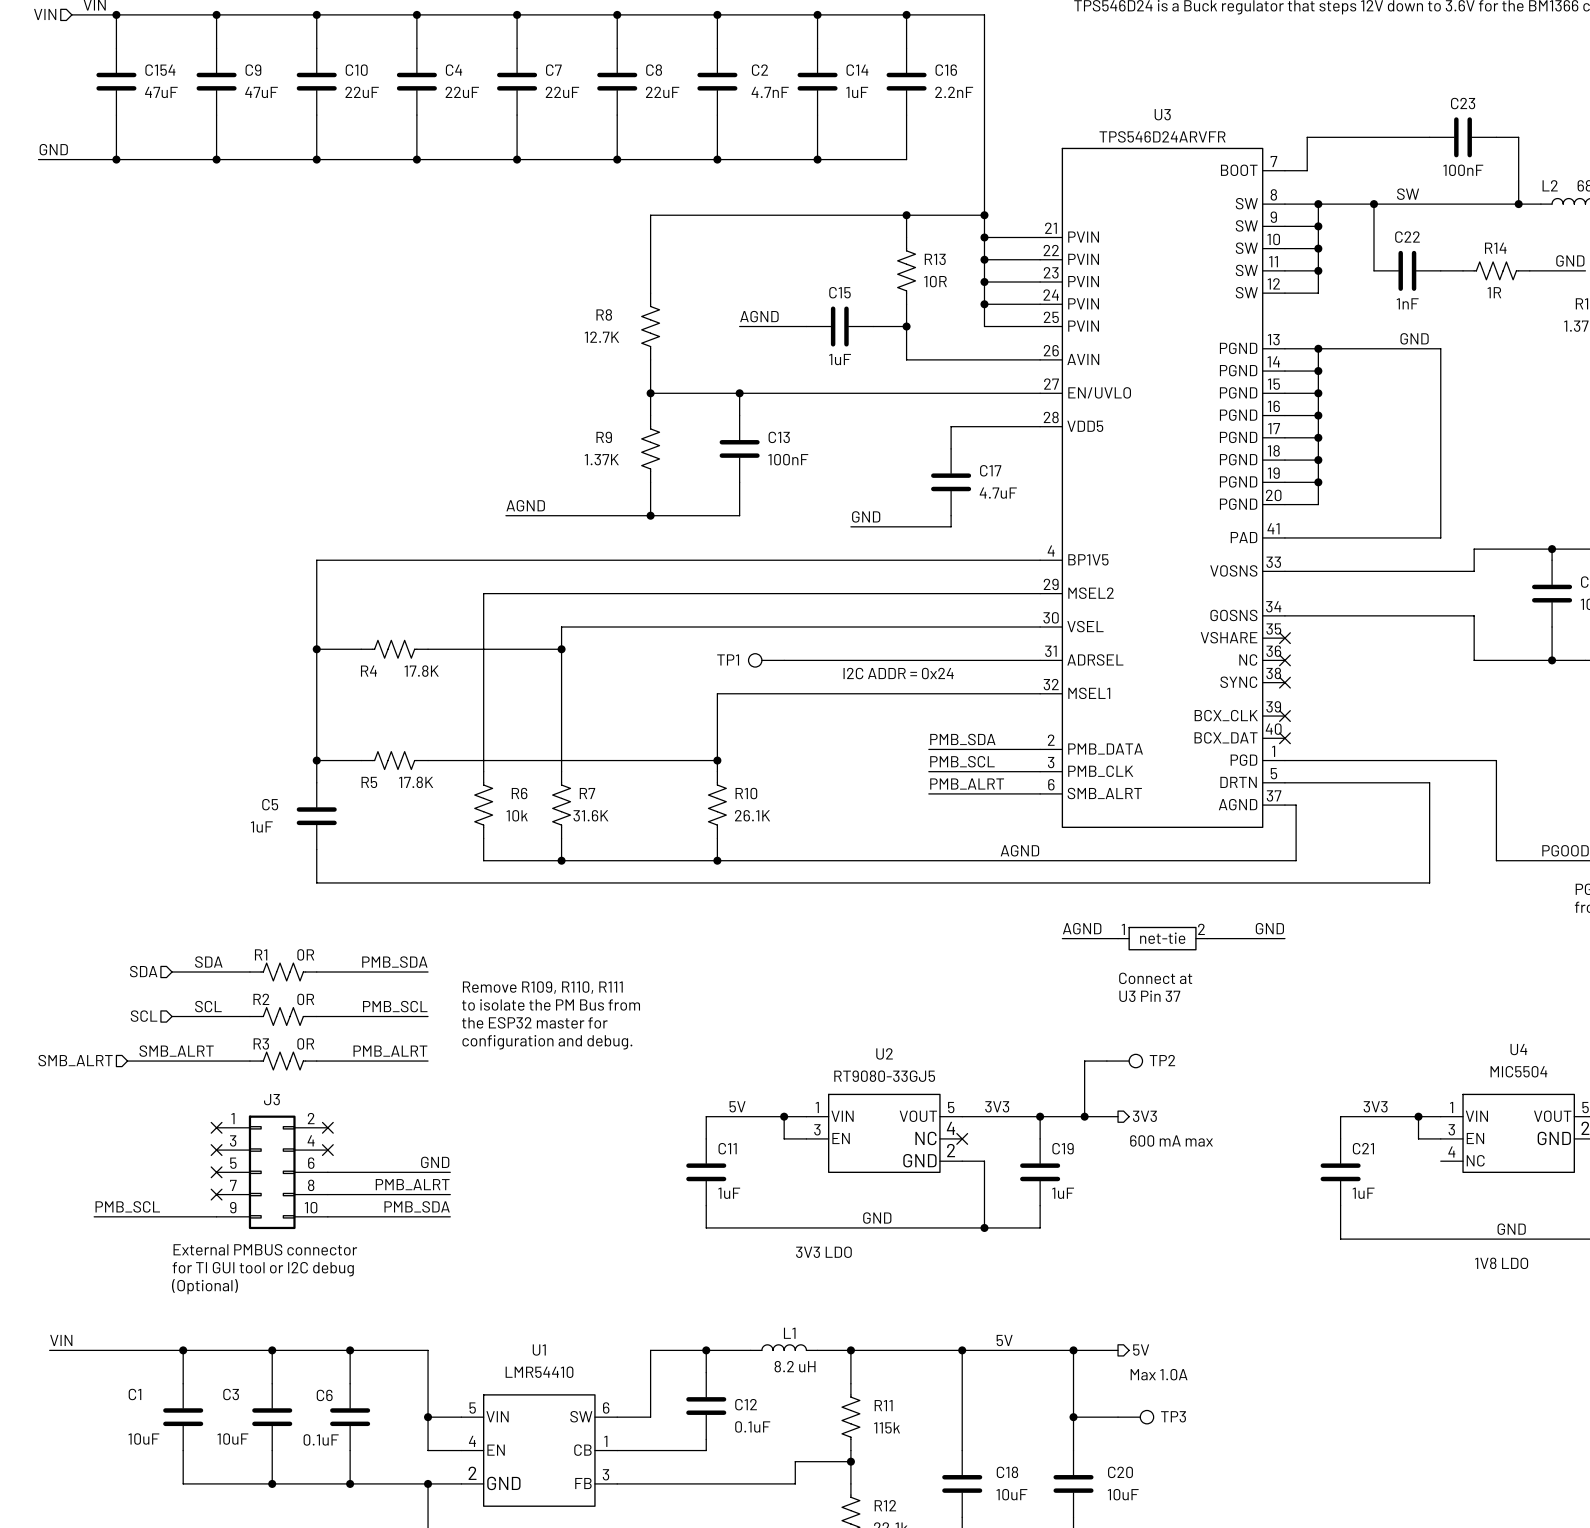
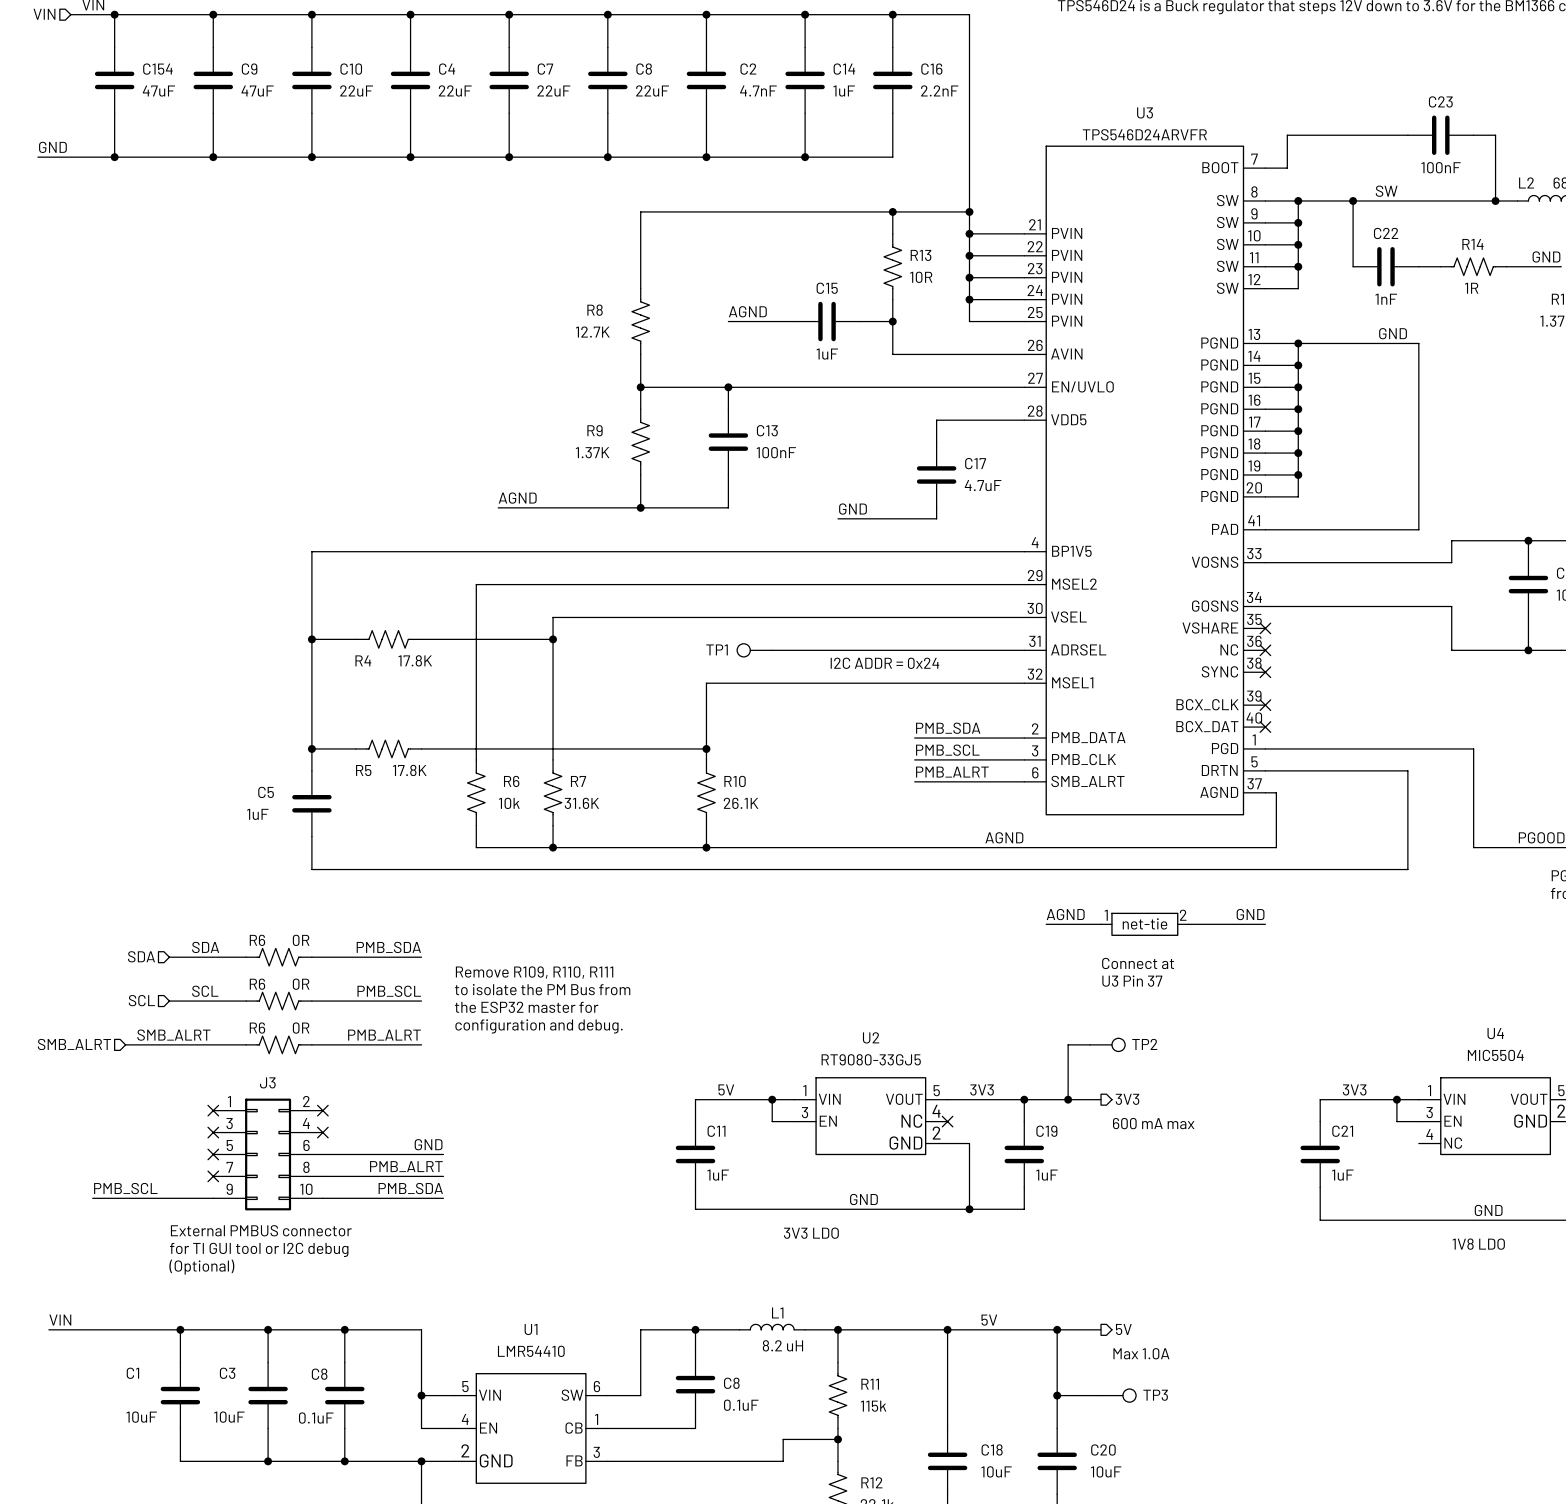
R1 name: R1 (261, 954) -> R6 (257, 940)
R2 name: R2 (261, 999) -> R6 (257, 984)
R3 name: R3 (261, 1043) -> R6 (257, 1028)
C6 name: C6 (324, 1395) -> C8 (319, 1374)
C12 name: C12 (746, 1404) -> C8 (731, 1383)

